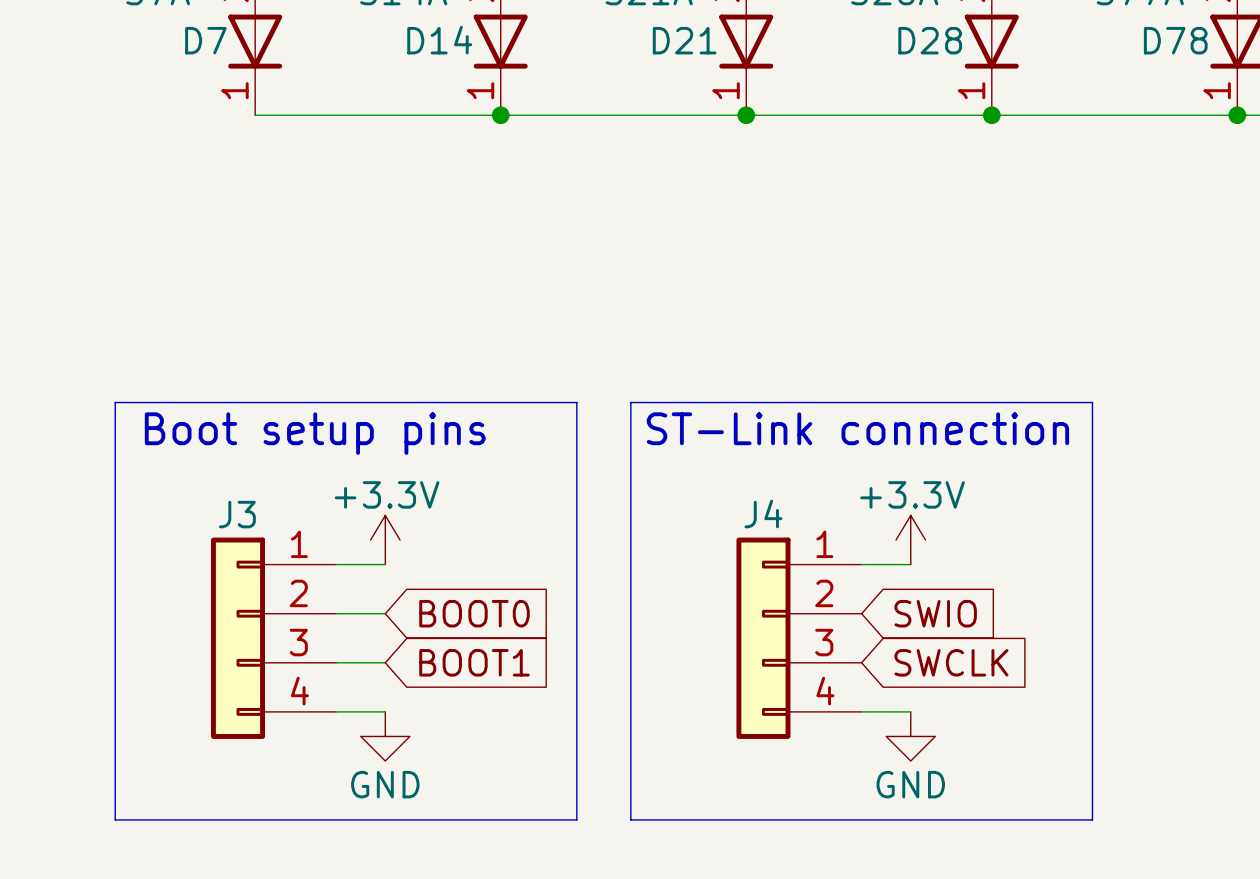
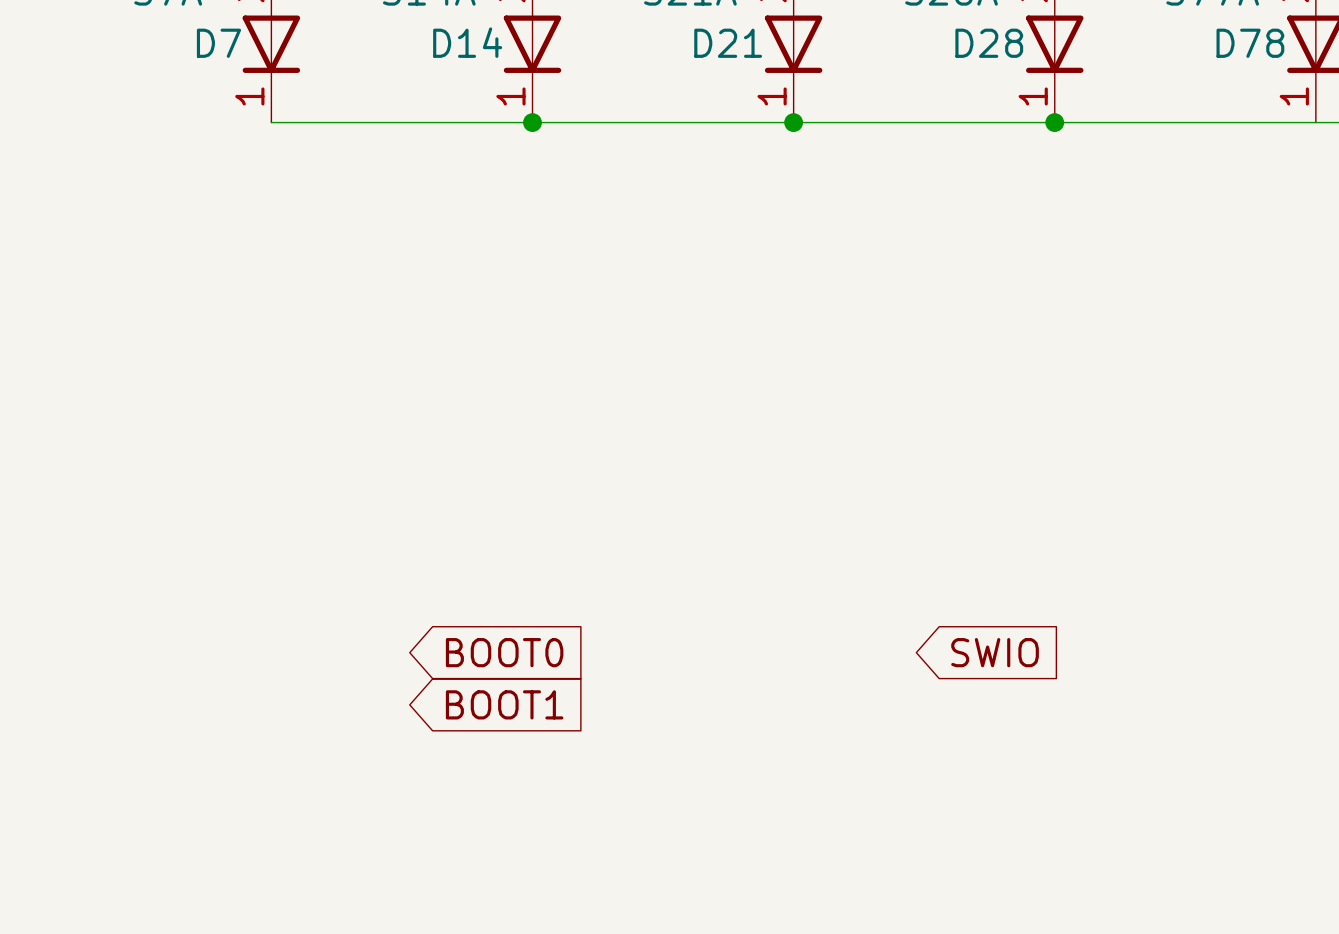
junction: (1237, 115) -> none
line: (115, 402) (576, 402) (576, 819) (115, 819) (115, 402) -> none
line: (630, 402) (1092, 402) (1092, 819) (630, 819) (630, 402) -> none
text: ST-Link connection (857, 428) -> none
text: Boot setup pins (315, 433) -> none
power symbol: +3.3V (385, 540) -> none
power symbol: +3.3V (910, 540) -> none
wire: (336, 564) (385, 564) -> none
wire: (861, 564) (910, 564) -> none
wire: (336, 613) (385, 613) -> none
J3: (273, 638) -> none
J4: (799, 638) -> none
wire: (336, 662) (385, 662) -> none
global label: SWCLK (951, 662) -> none
wire: (336, 711) (385, 711) -> none
wire: (861, 711) (910, 711) -> none
power symbol: GND (385, 736) -> none
power symbol: GND (910, 736) -> none

